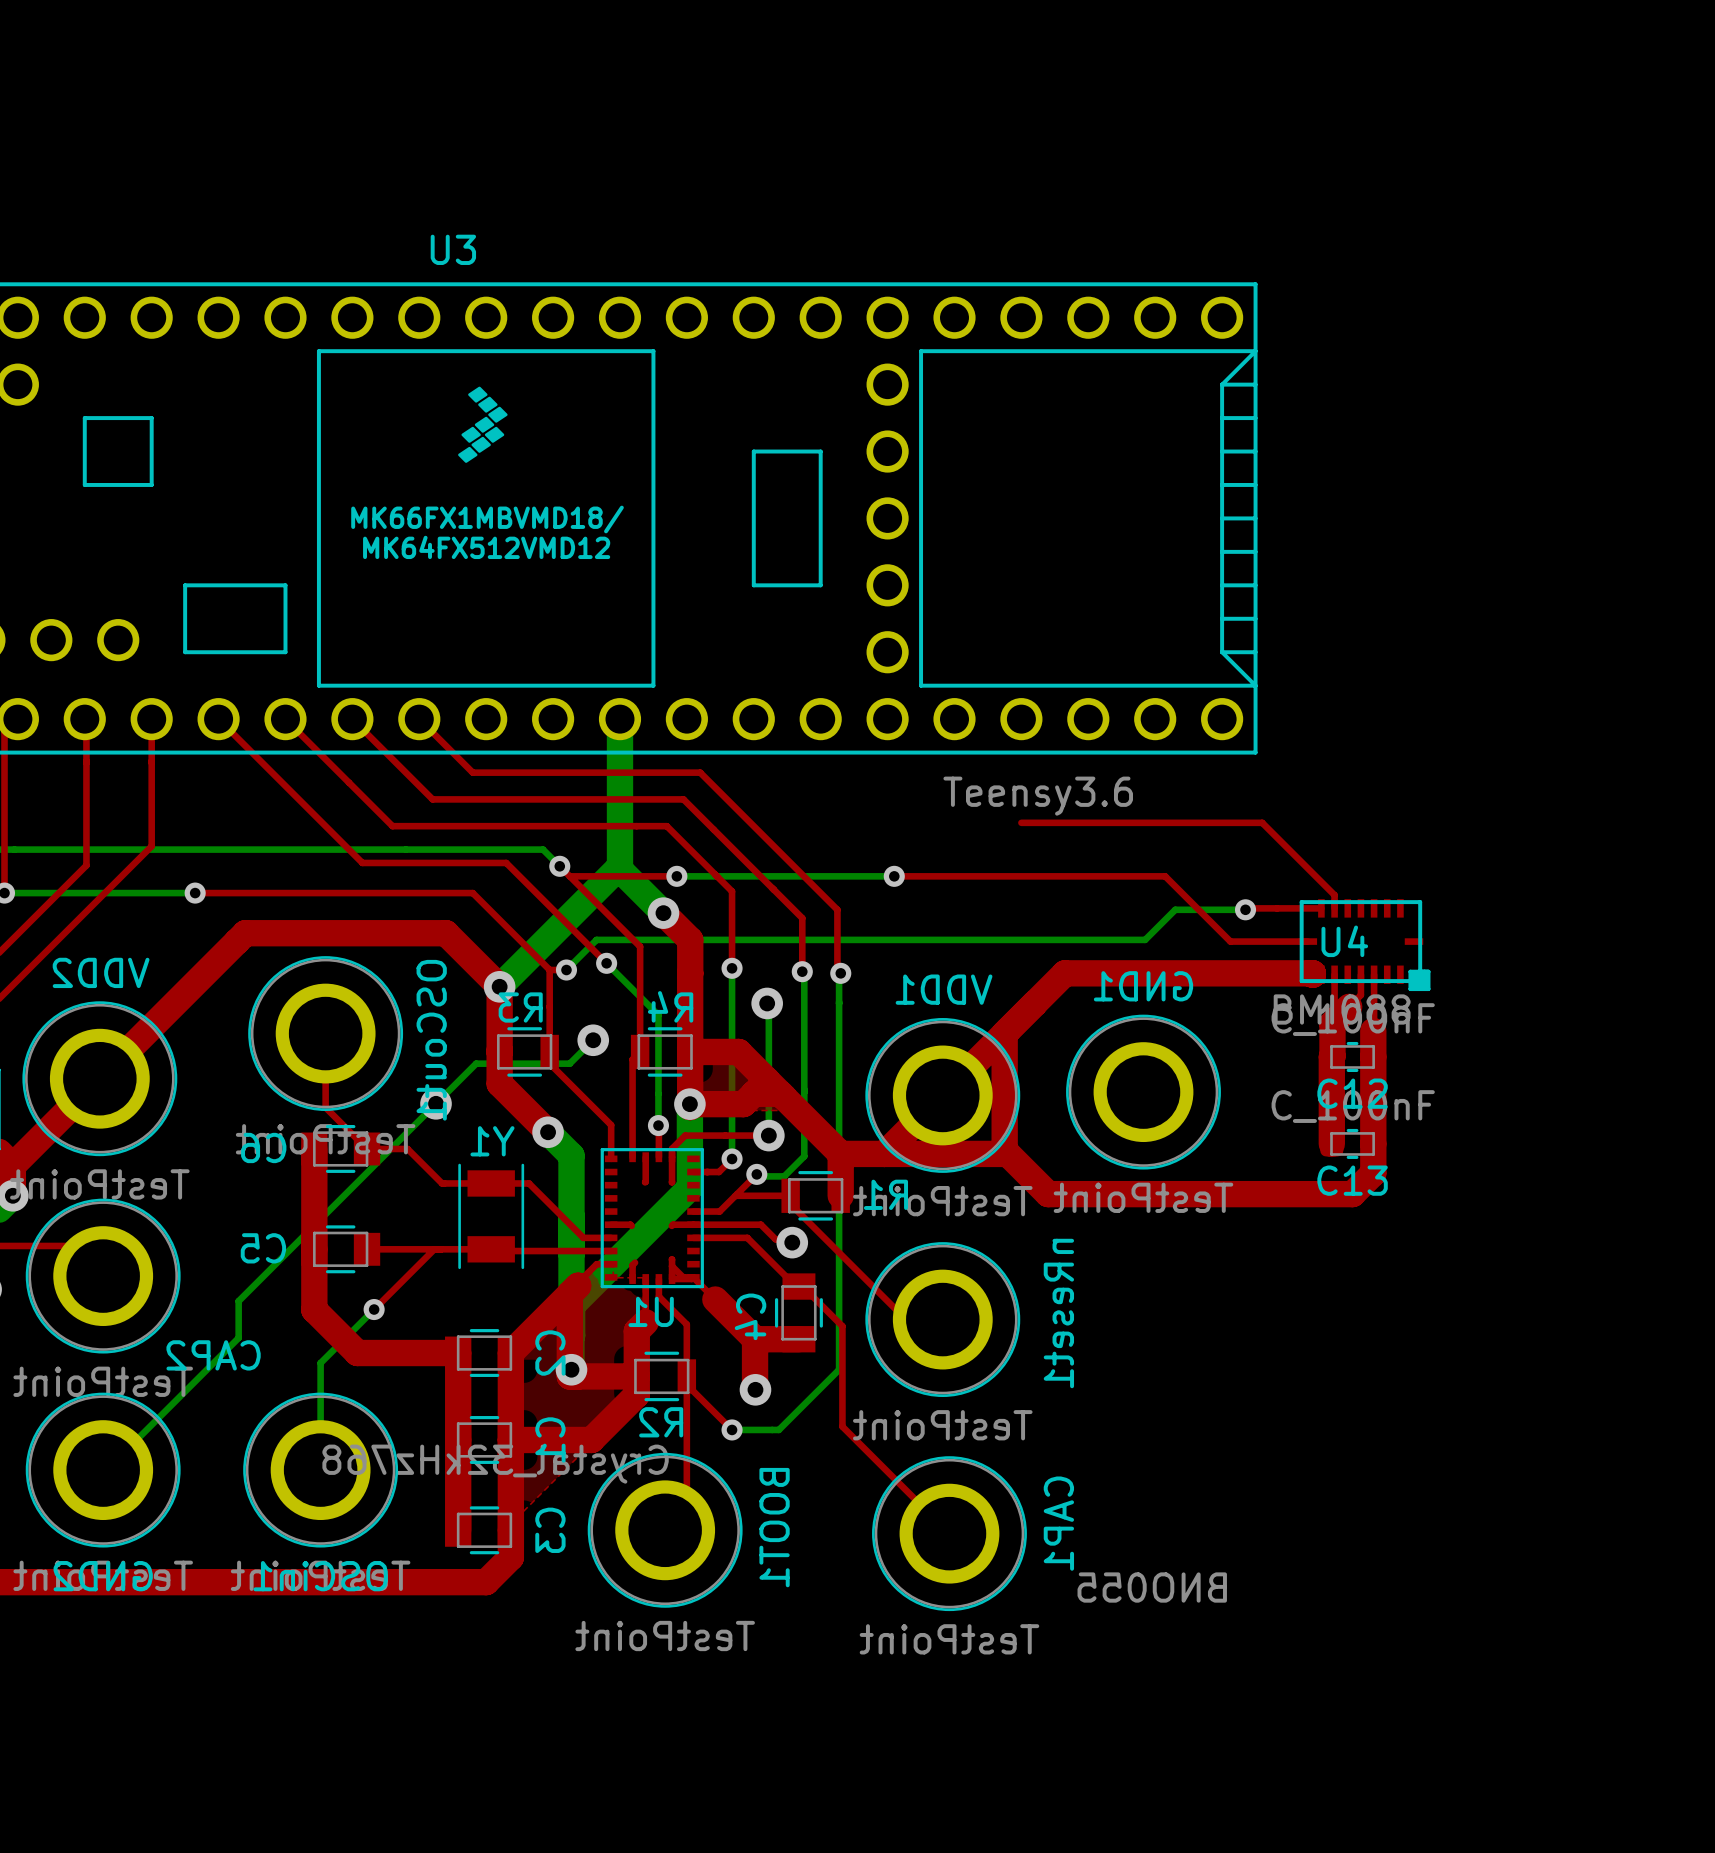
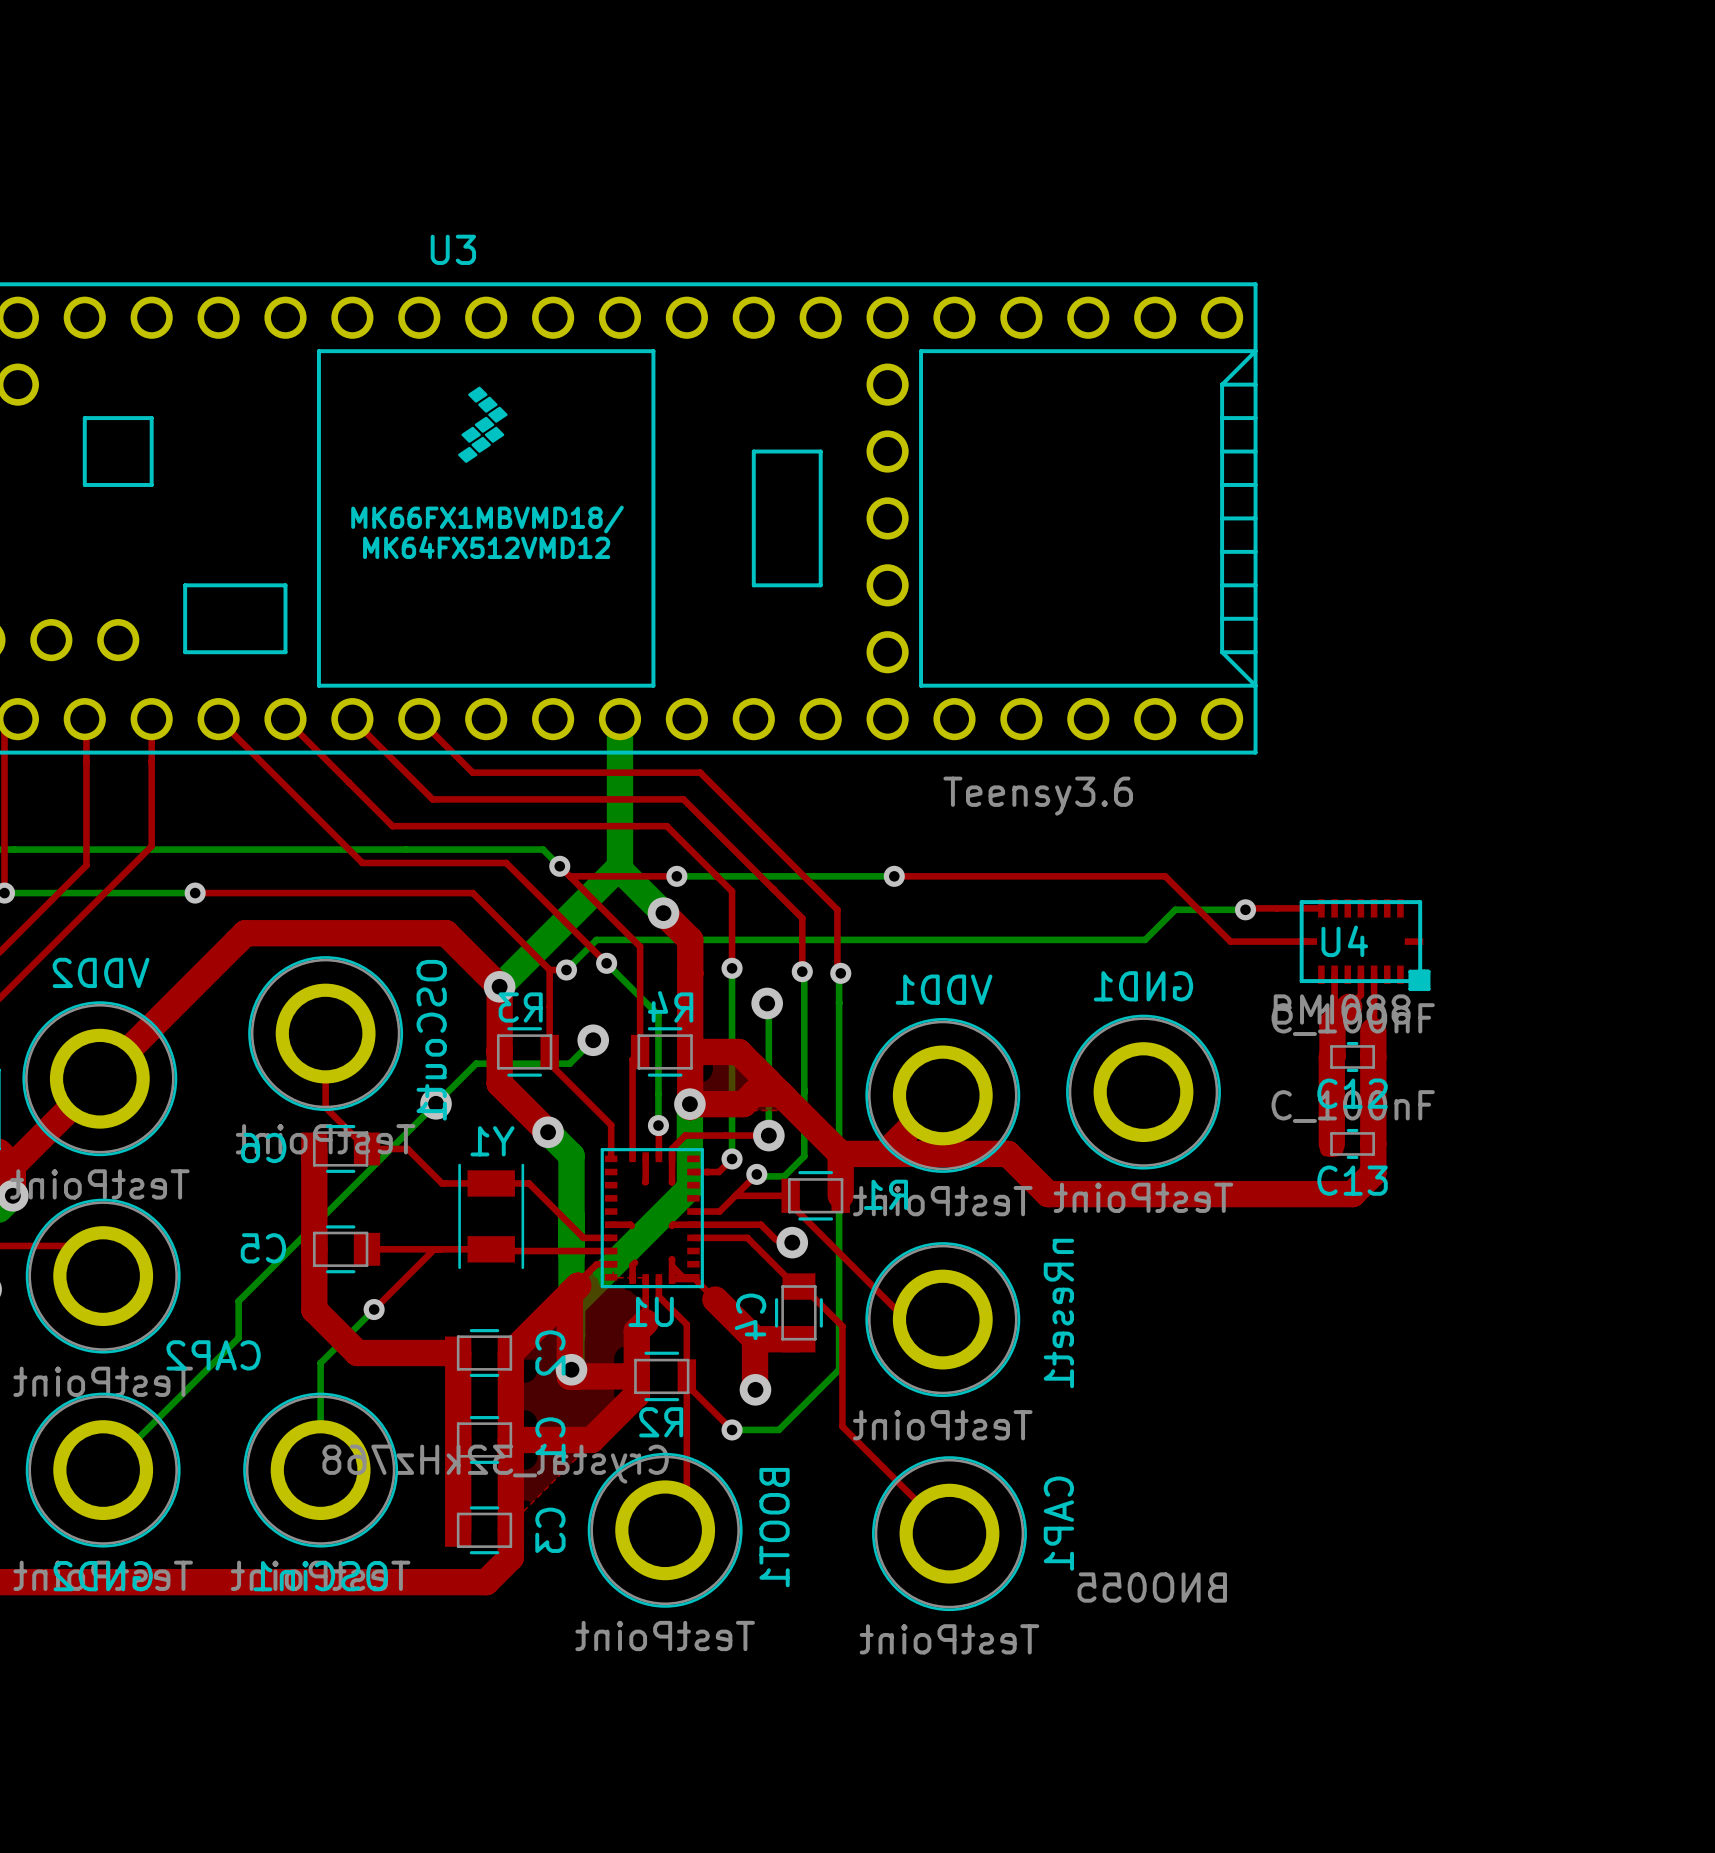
top track: (1021, 822) (1262, 822) (1334, 895) (1334, 908) -> none
top track: (1312, 974) (1064, 973) (942, 1095) -> none
top track: (1004, 1033) (1004, 1153) -> none

